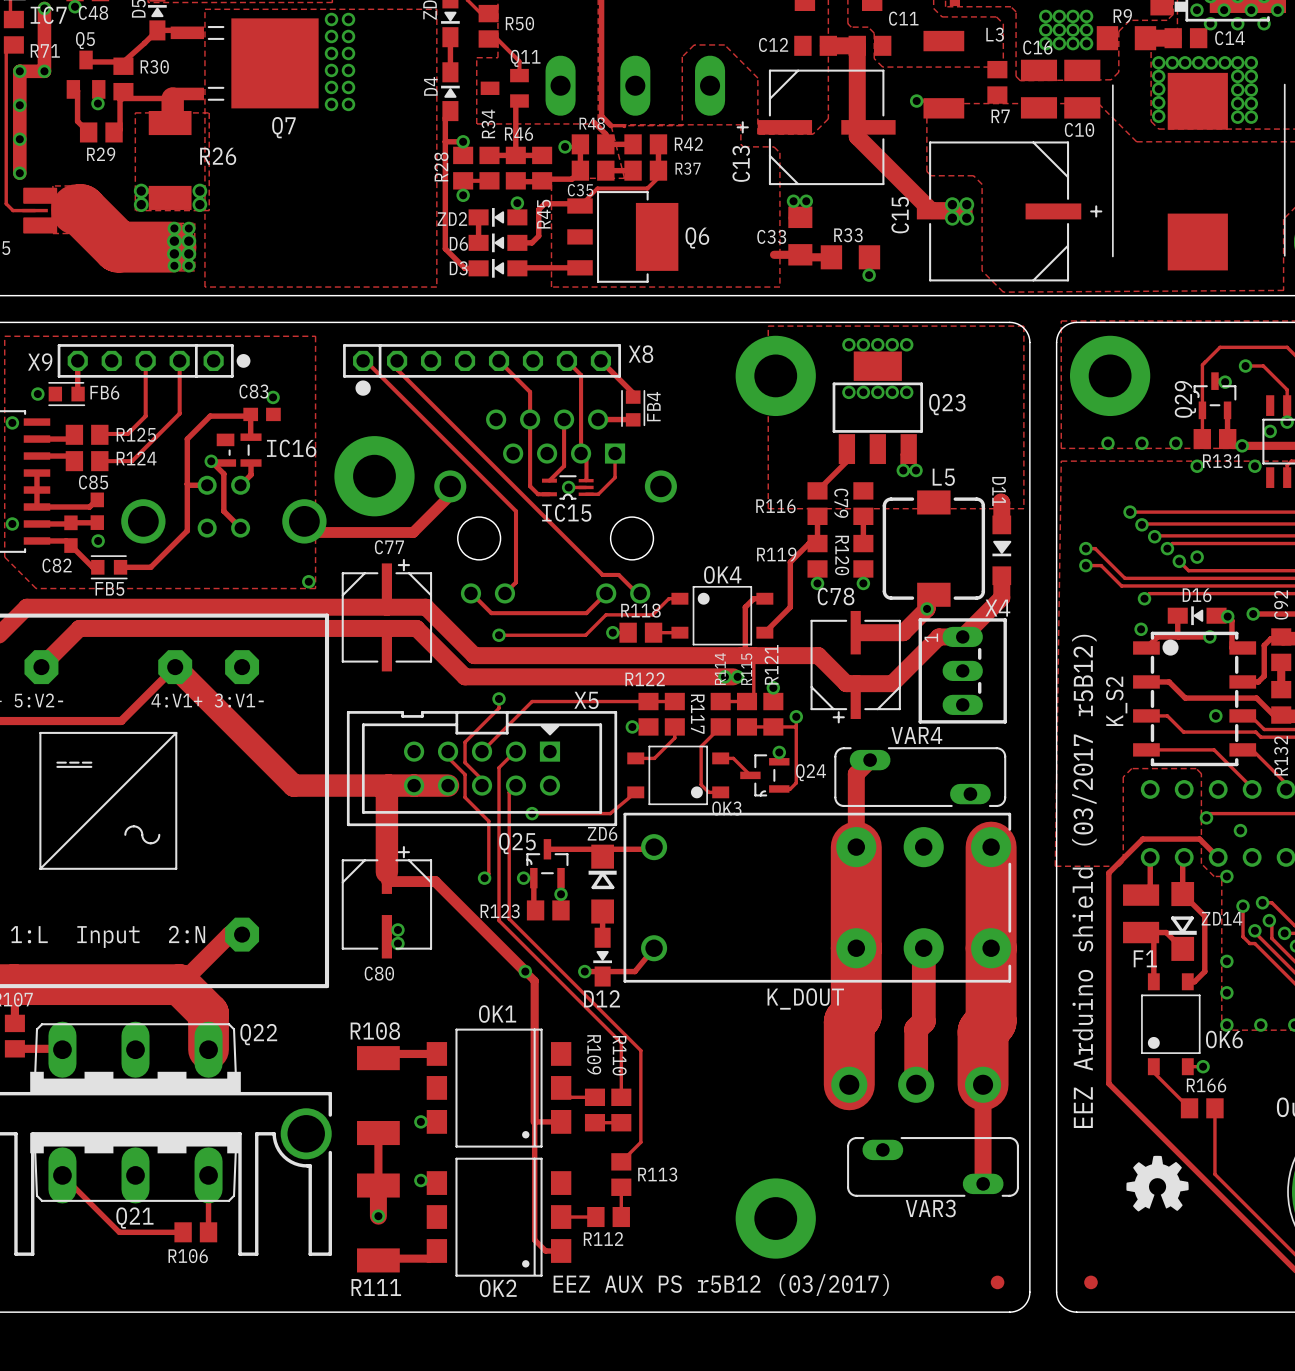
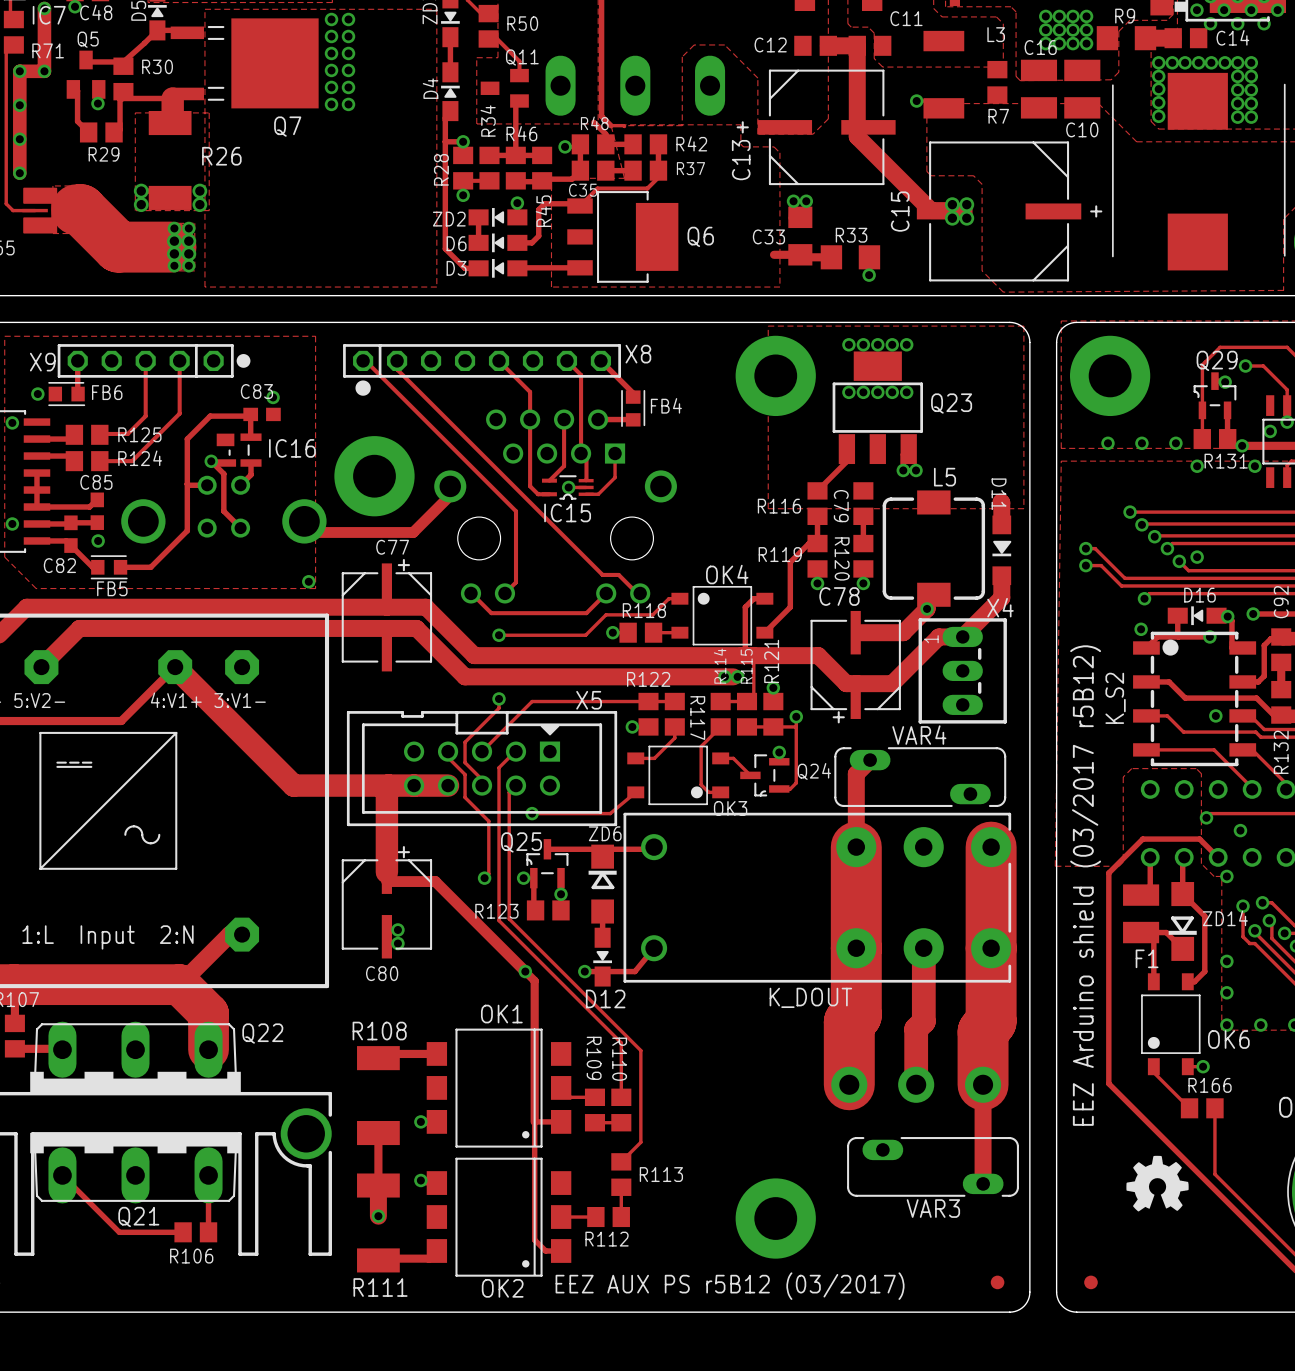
Q29 name rotation: 0° (1185, 399) -> 90° clockwise (1217, 360)
FB4 name rotation: 0° (653, 406) -> 90° clockwise (666, 405)

